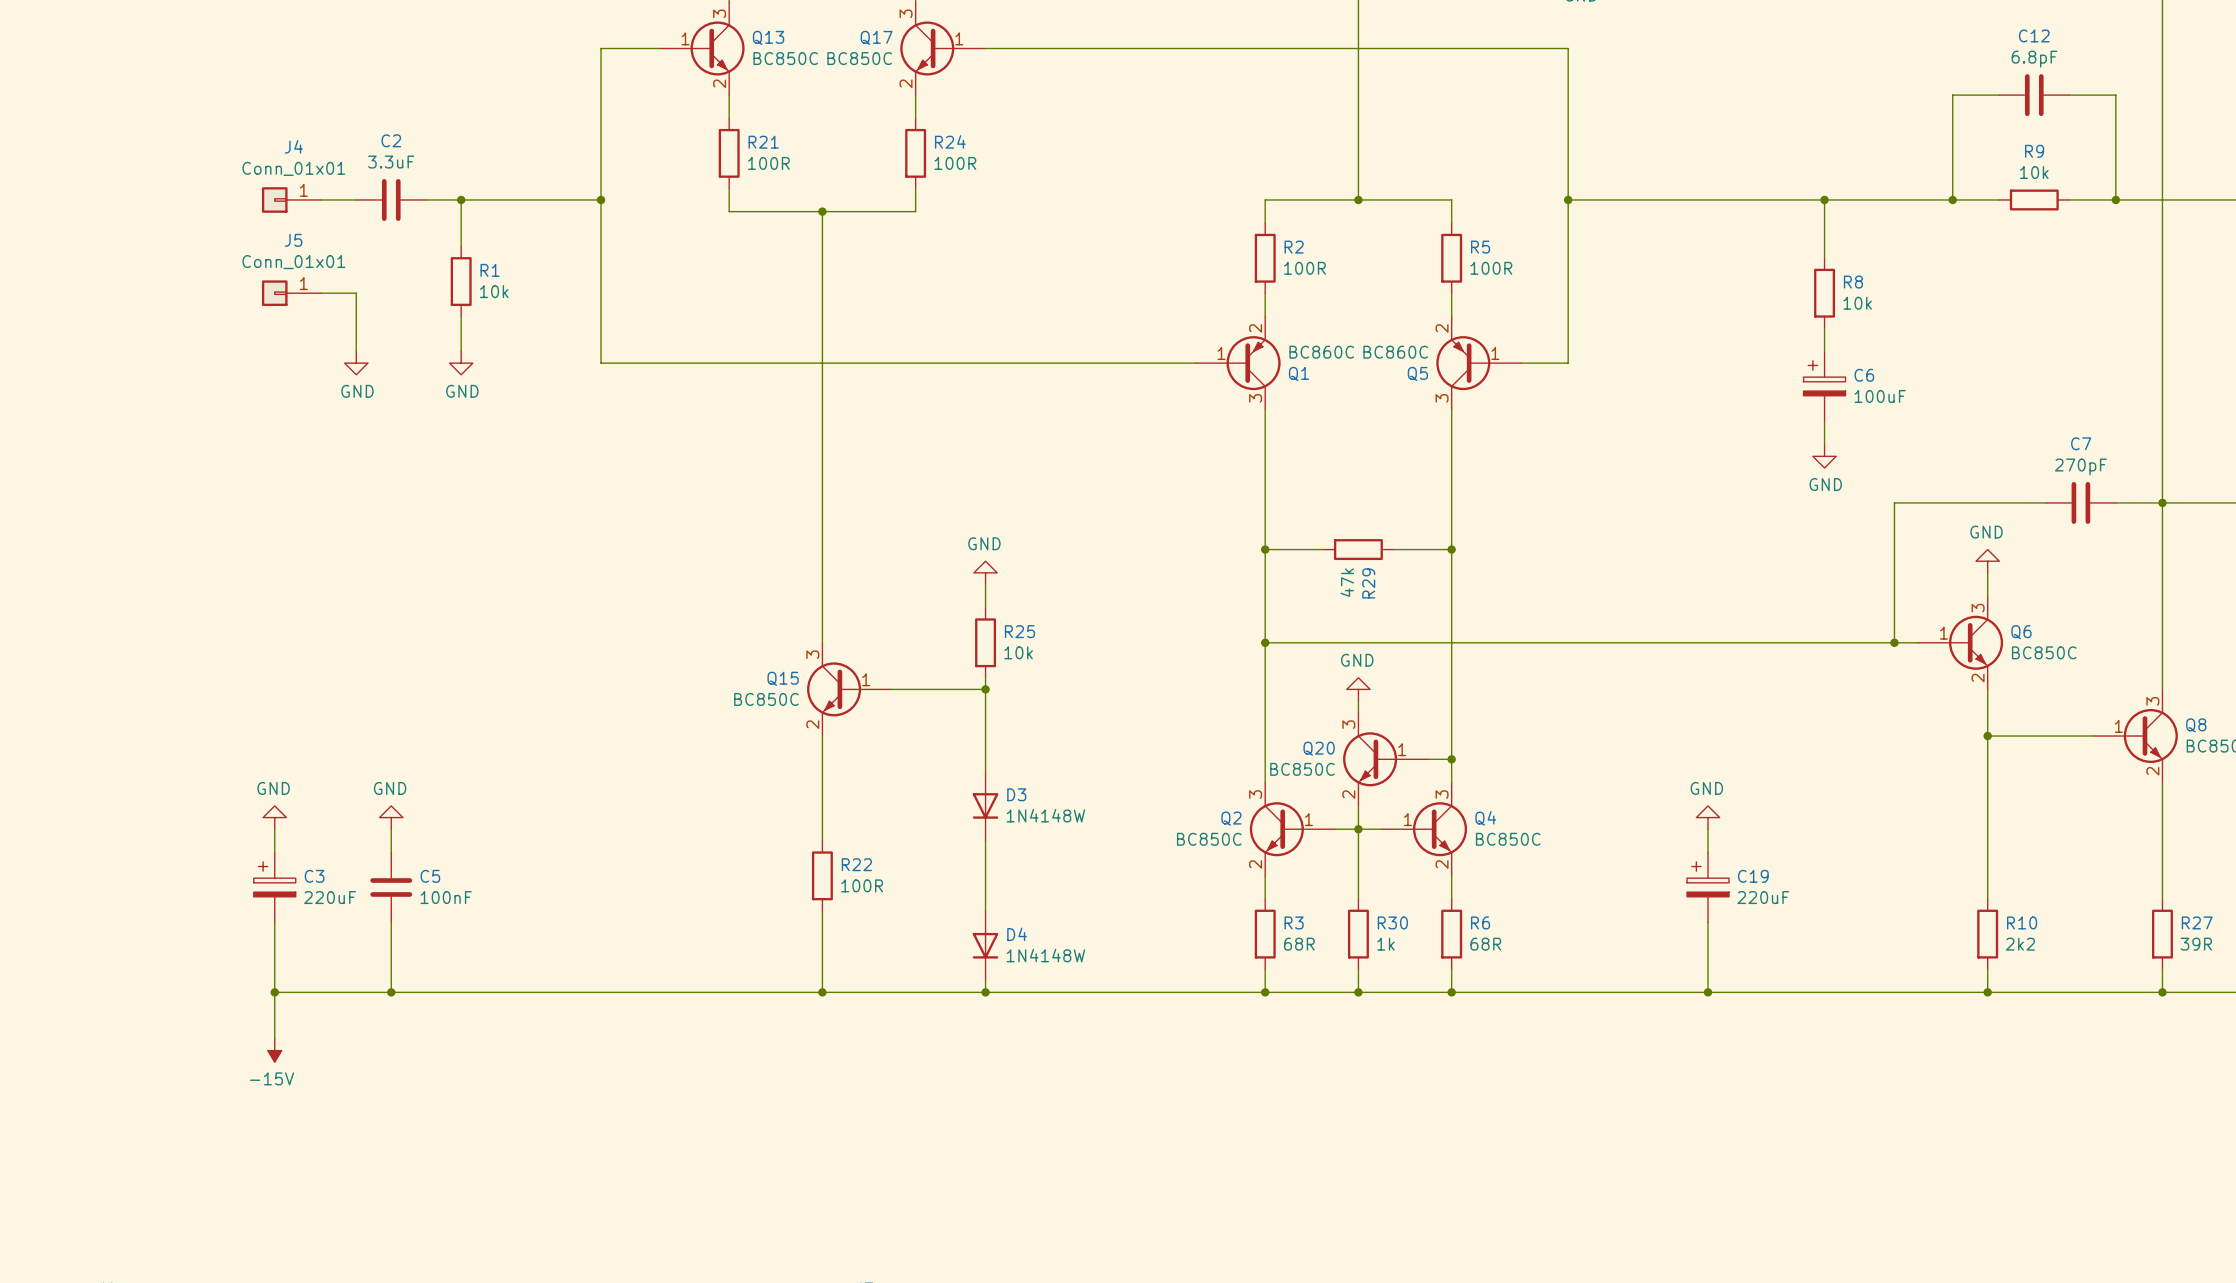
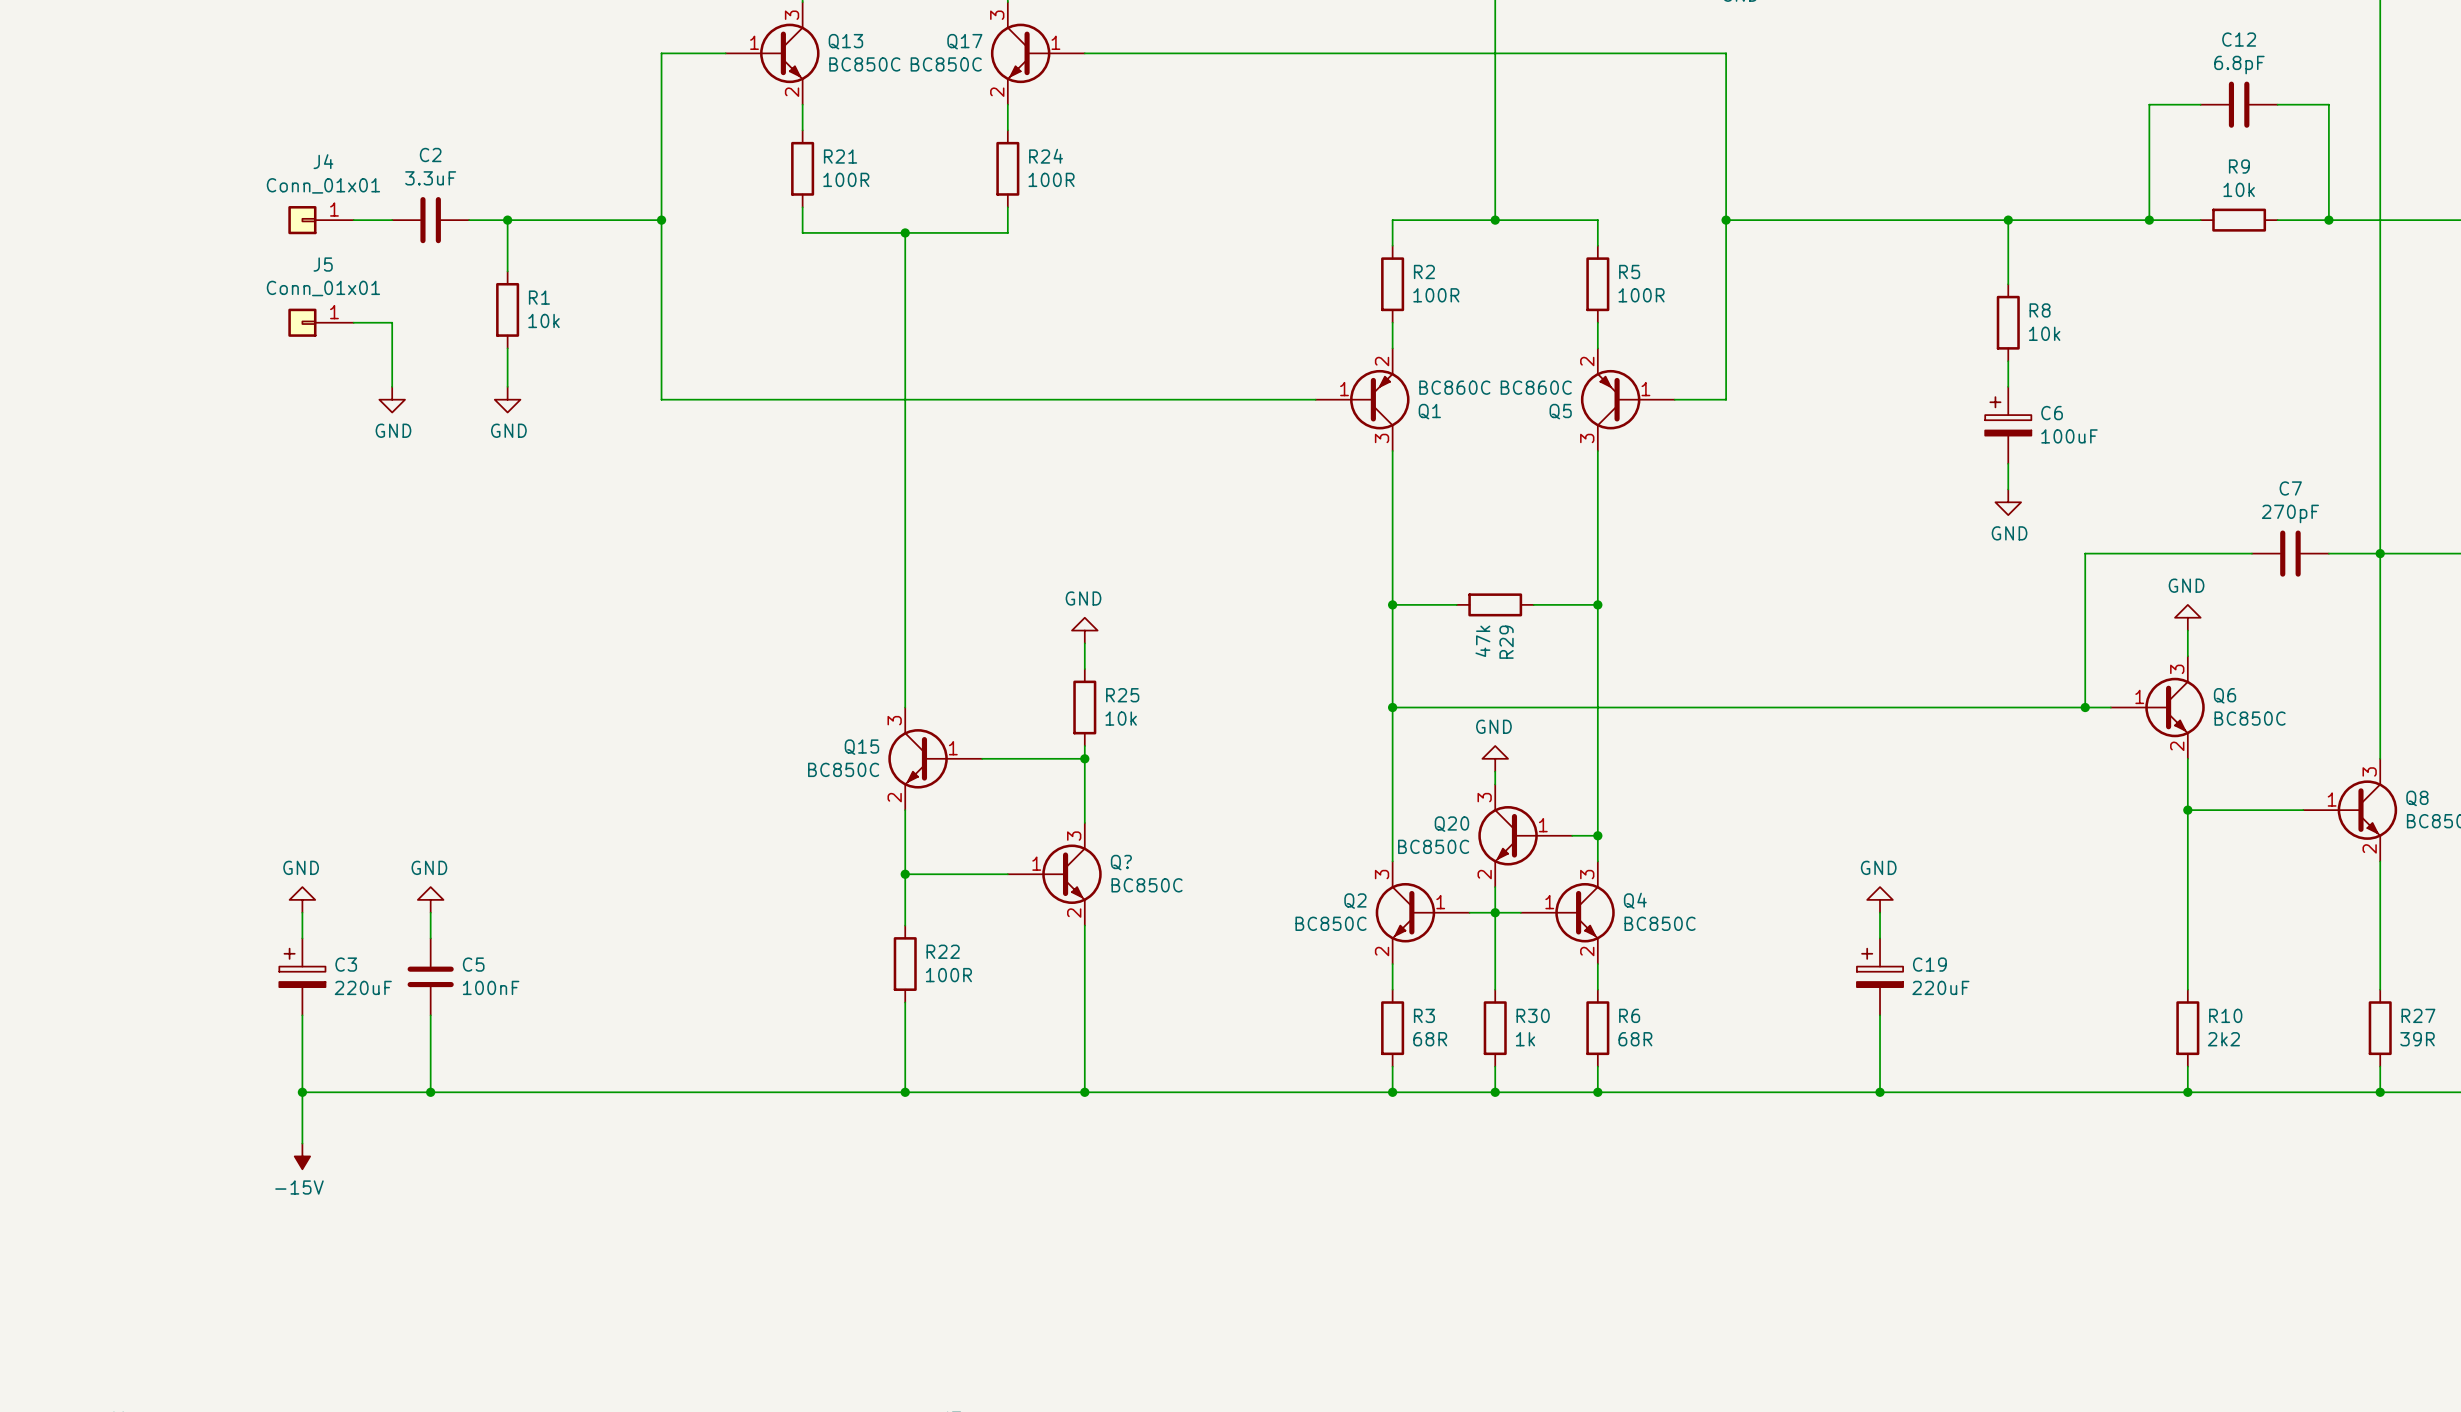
wire: none -> (905, 874) (1007, 874)
junction: none -> (905, 874)
Q?: none -> BC850C (1054, 874)
D3: 1N4148W (985, 805) -> none
D4: 1N4148W (985, 945) -> none

